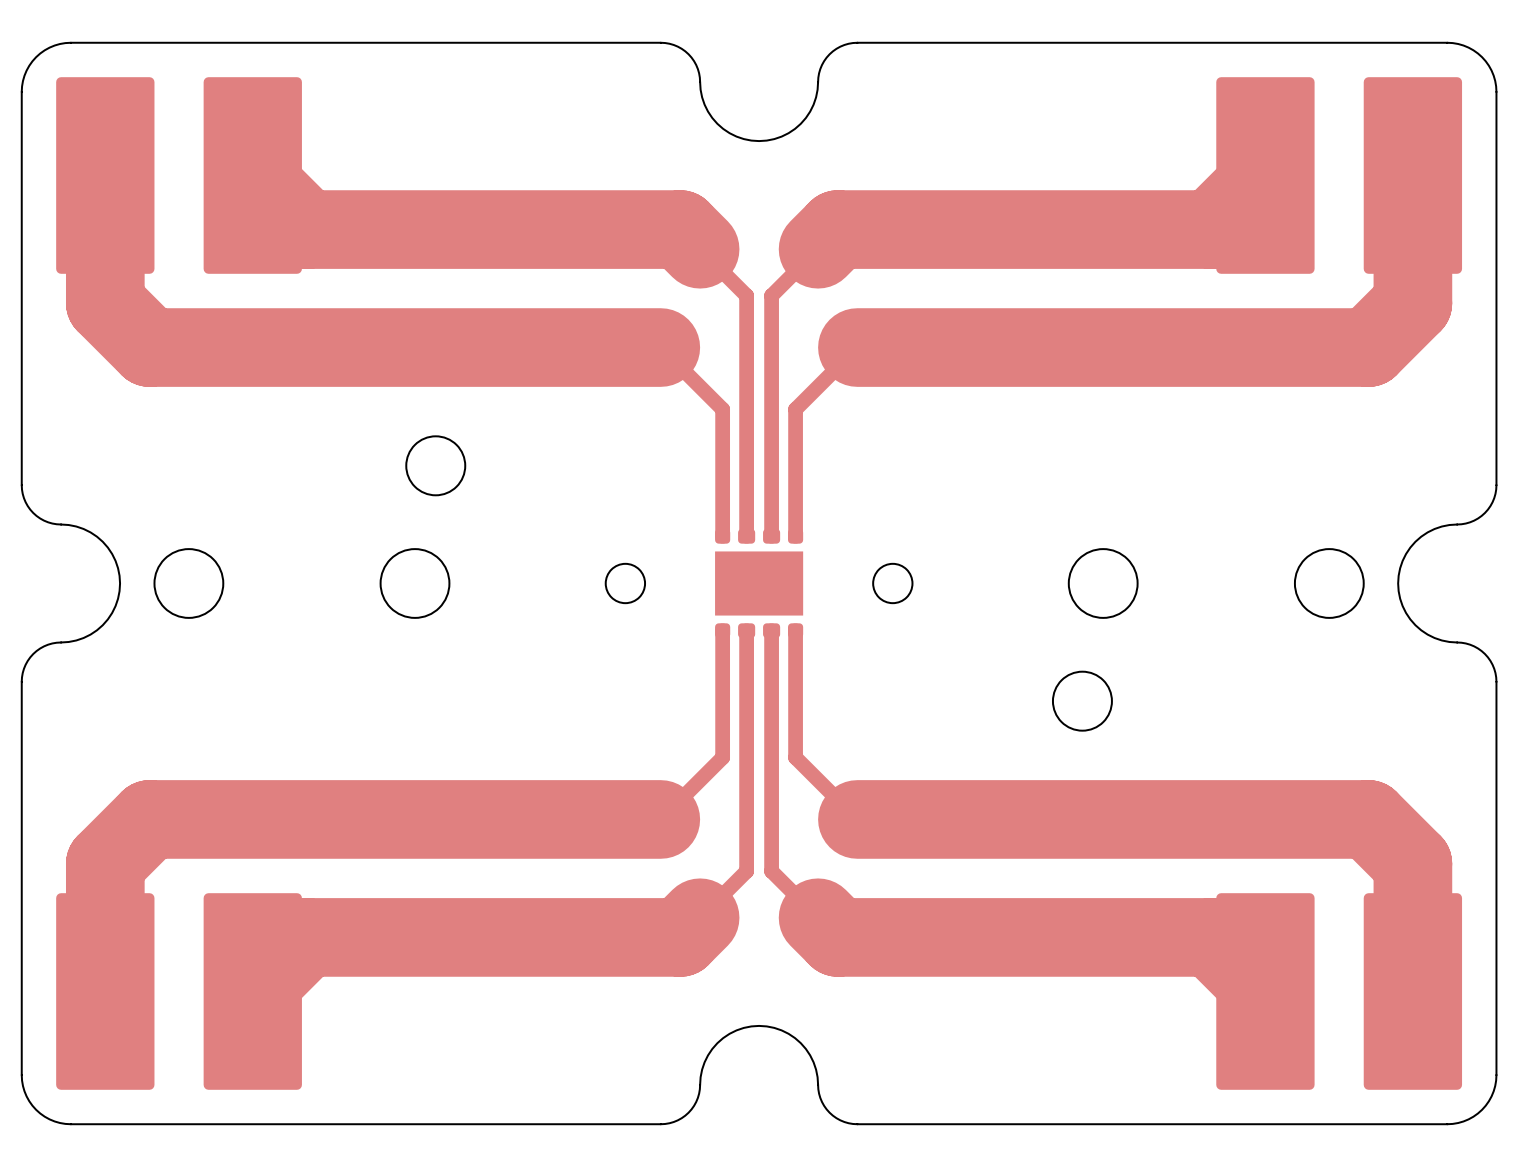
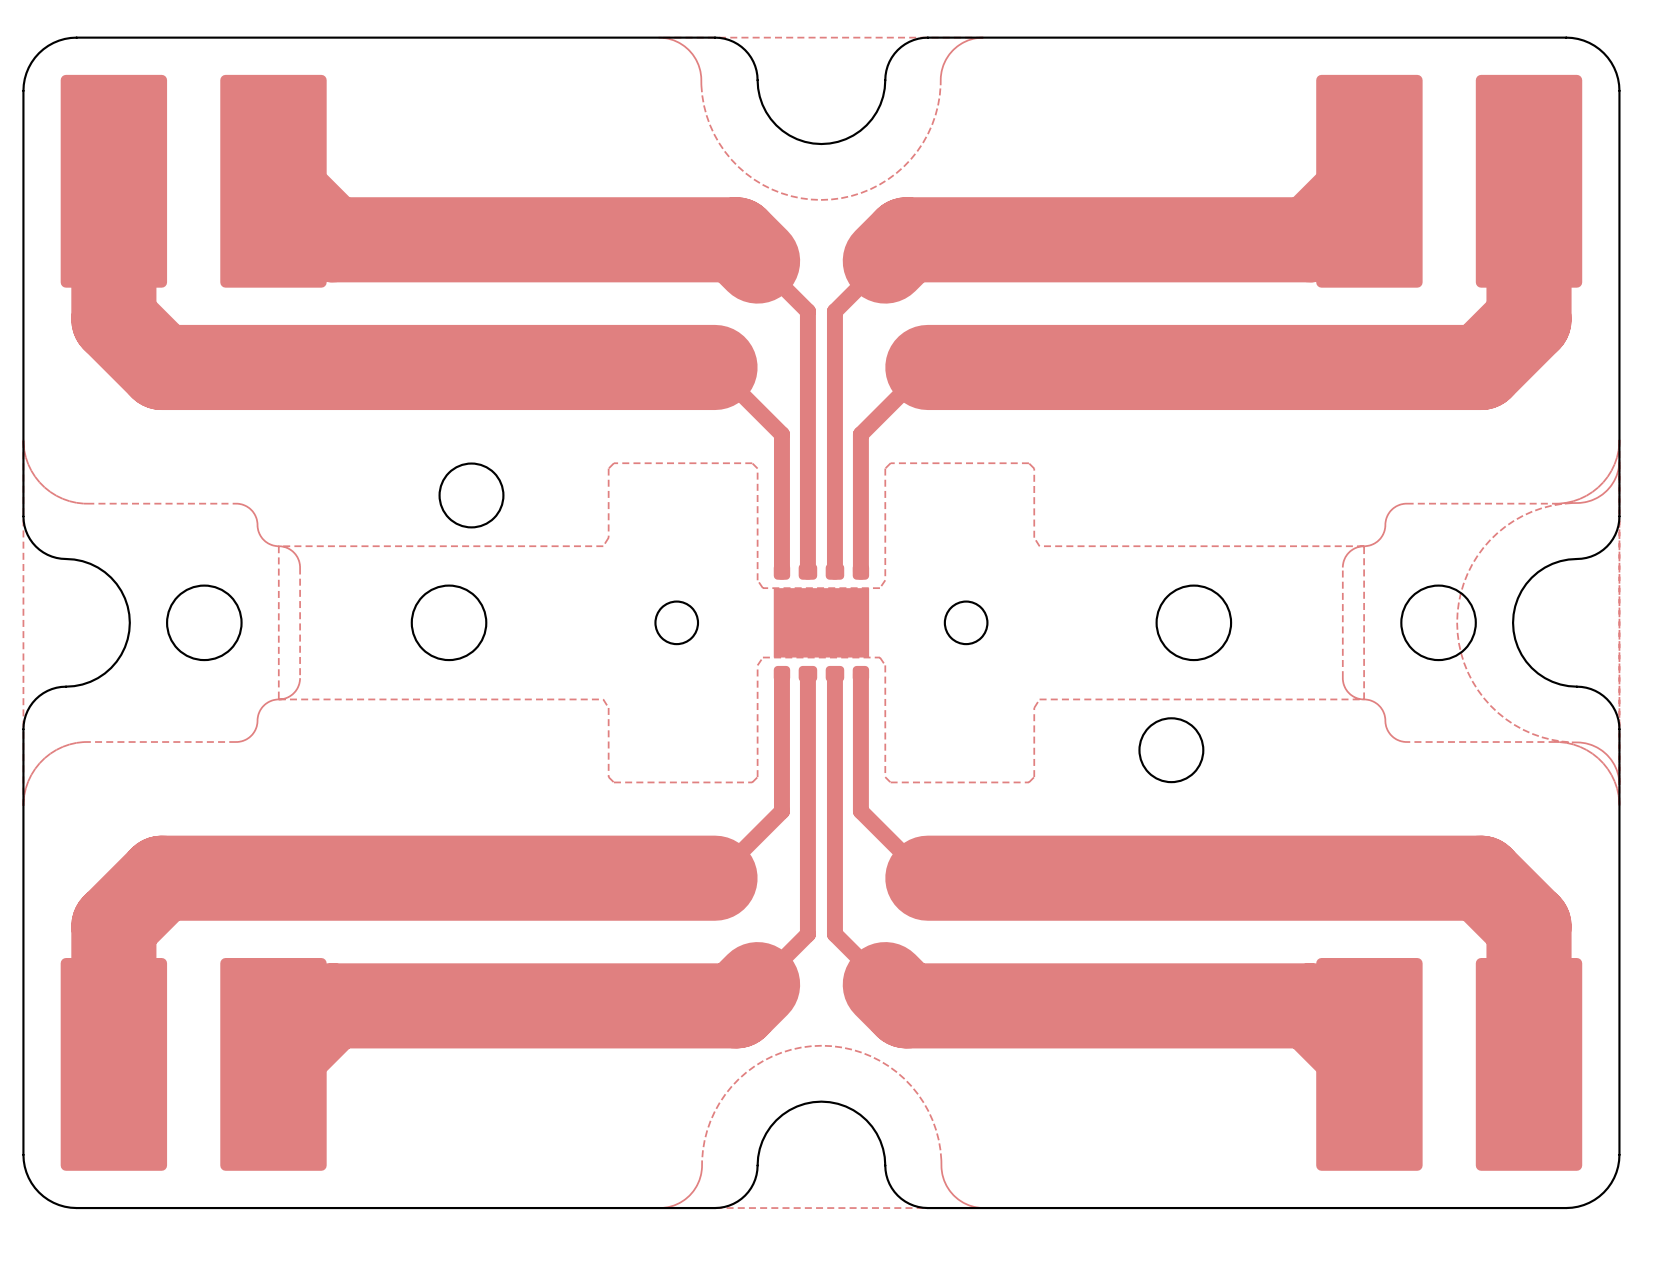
top zone outline: none -> (983, 37) (962, 42) (953, 50) (945, 59) (941, 71) (938, 105) (932, 124) (917, 151) (903, 166) (888, 179) (870, 189) (841, 198) (821, 199) (800, 198) (771, 189) (753, 179) (738, 166) (724, 151) (709, 124) (703, 105) (700, 71) (696, 59) (688, 50) (679, 42) (658, 37) (983, 37)
top zone outline: none -> (23, 439) (23, 805) (25, 788) (35, 768) (50, 753) (69, 744) (83, 742) (238, 741) (249, 737) (255, 730) (258, 714) (262, 707) (272, 700) (288, 696) (295, 691) (299, 684) (300, 565) (295, 553) (288, 548) (272, 545) (265, 541) (258, 531) (255, 514) (249, 508) (242, 504) (83, 503) (62, 498) (44, 487) (35, 476) (25, 457) (23, 439)
top zone outline: none -> (1619, 439) (1619, 805) (1617, 788) (1607, 768) (1592, 753) (1573, 744) (1559, 742) (1404, 741) (1393, 737) (1387, 730) (1384, 714) (1380, 707) (1370, 700) (1354, 696) (1347, 691) (1343, 684) (1342, 565) (1347, 553) (1354, 548) (1370, 545) (1377, 541) (1384, 531) (1387, 514) (1393, 508) (1400, 504) (1559, 503) (1580, 498) (1598, 487) (1607, 476) (1617, 457) (1619, 439)
top zone outline: none -> (1619, 460) (1614, 480) (1607, 490) (1597, 497) (1585, 502) (1551, 505) (1532, 511) (1505, 526) (1490, 539) (1477, 555) (1467, 573) (1458, 602) (1457, 622) (1458, 642) (1467, 672) (1477, 689) (1490, 705) (1505, 719) (1532, 733) (1551, 739) (1585, 743) (1597, 747) (1607, 754) (1614, 764) (1619, 784)
top zone outline: none -> (1028, 463) (1034, 468) (1034, 537) (1039, 546) (1364, 546) (1364, 699) (1039, 699) (1034, 707) (1034, 777) (1028, 782) (890, 782) (885, 777) (885, 665) (879, 657) (762, 657) (757, 665) (757, 777) (752, 782) (613, 782) (608, 777) (608, 707) (603, 699) (278, 699) (278, 546) (603, 546) (608, 537) (608, 468) (613, 463) (752, 463) (757, 468) (757, 580) (762, 588) (879, 588) (885, 580) (885, 468) (890, 463) (1028, 463)
top zone outline: none -> (821, 1045) (841, 1047) (871, 1056) (888, 1066) (904, 1079) (918, 1094) (932, 1120) (938, 1140) (942, 1174) (946, 1185) (953, 1195) (963, 1202) (984, 1208) (659, 1208) (679, 1202) (689, 1195) (696, 1185) (701, 1174) (704, 1140) (710, 1120) (725, 1094) (738, 1079) (754, 1066) (772, 1056) (801, 1047) (821, 1045)

